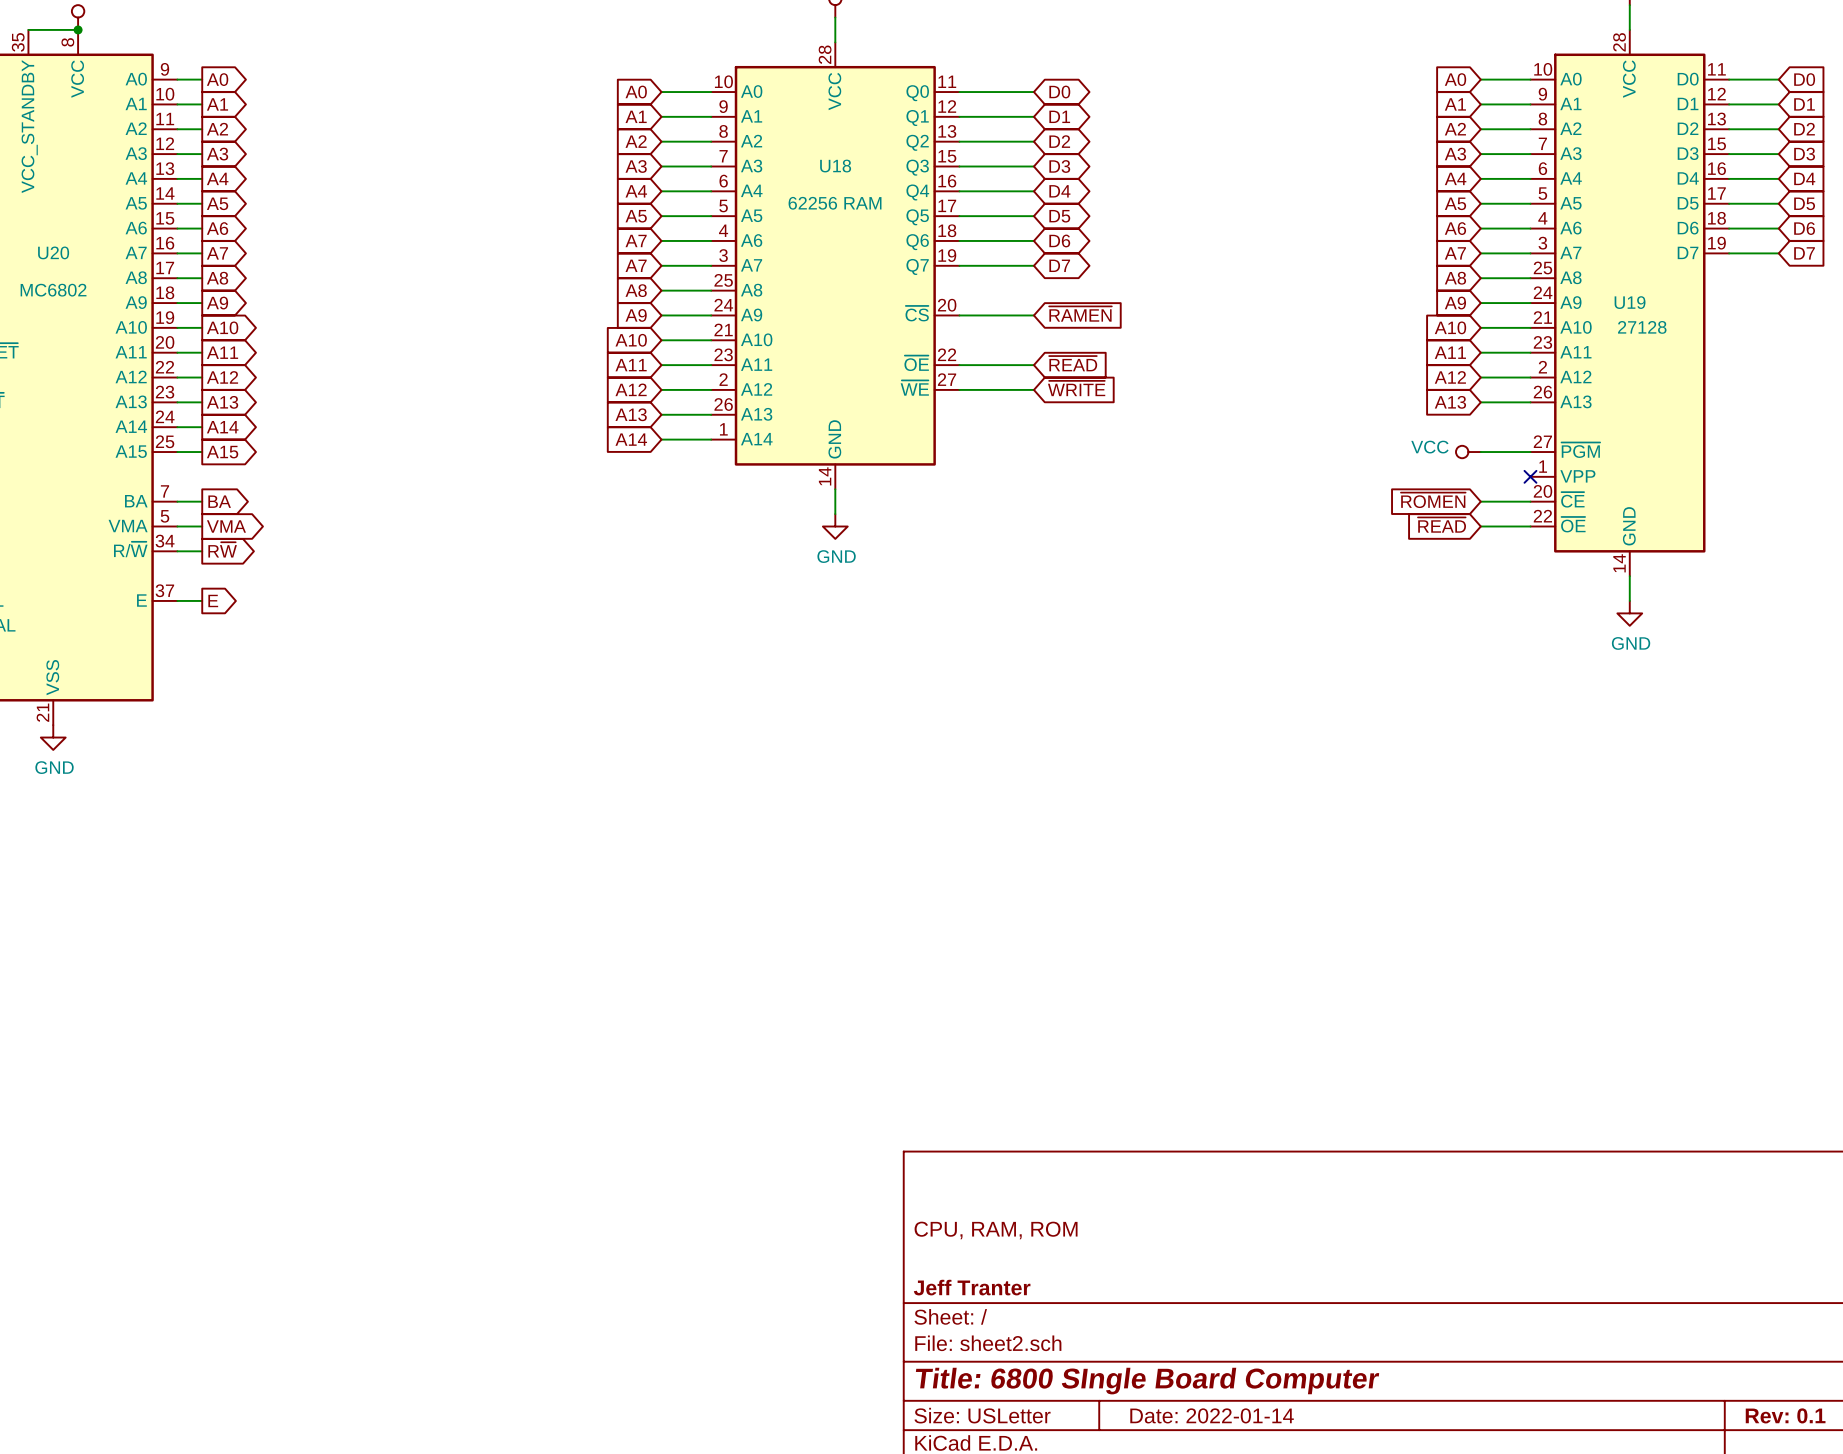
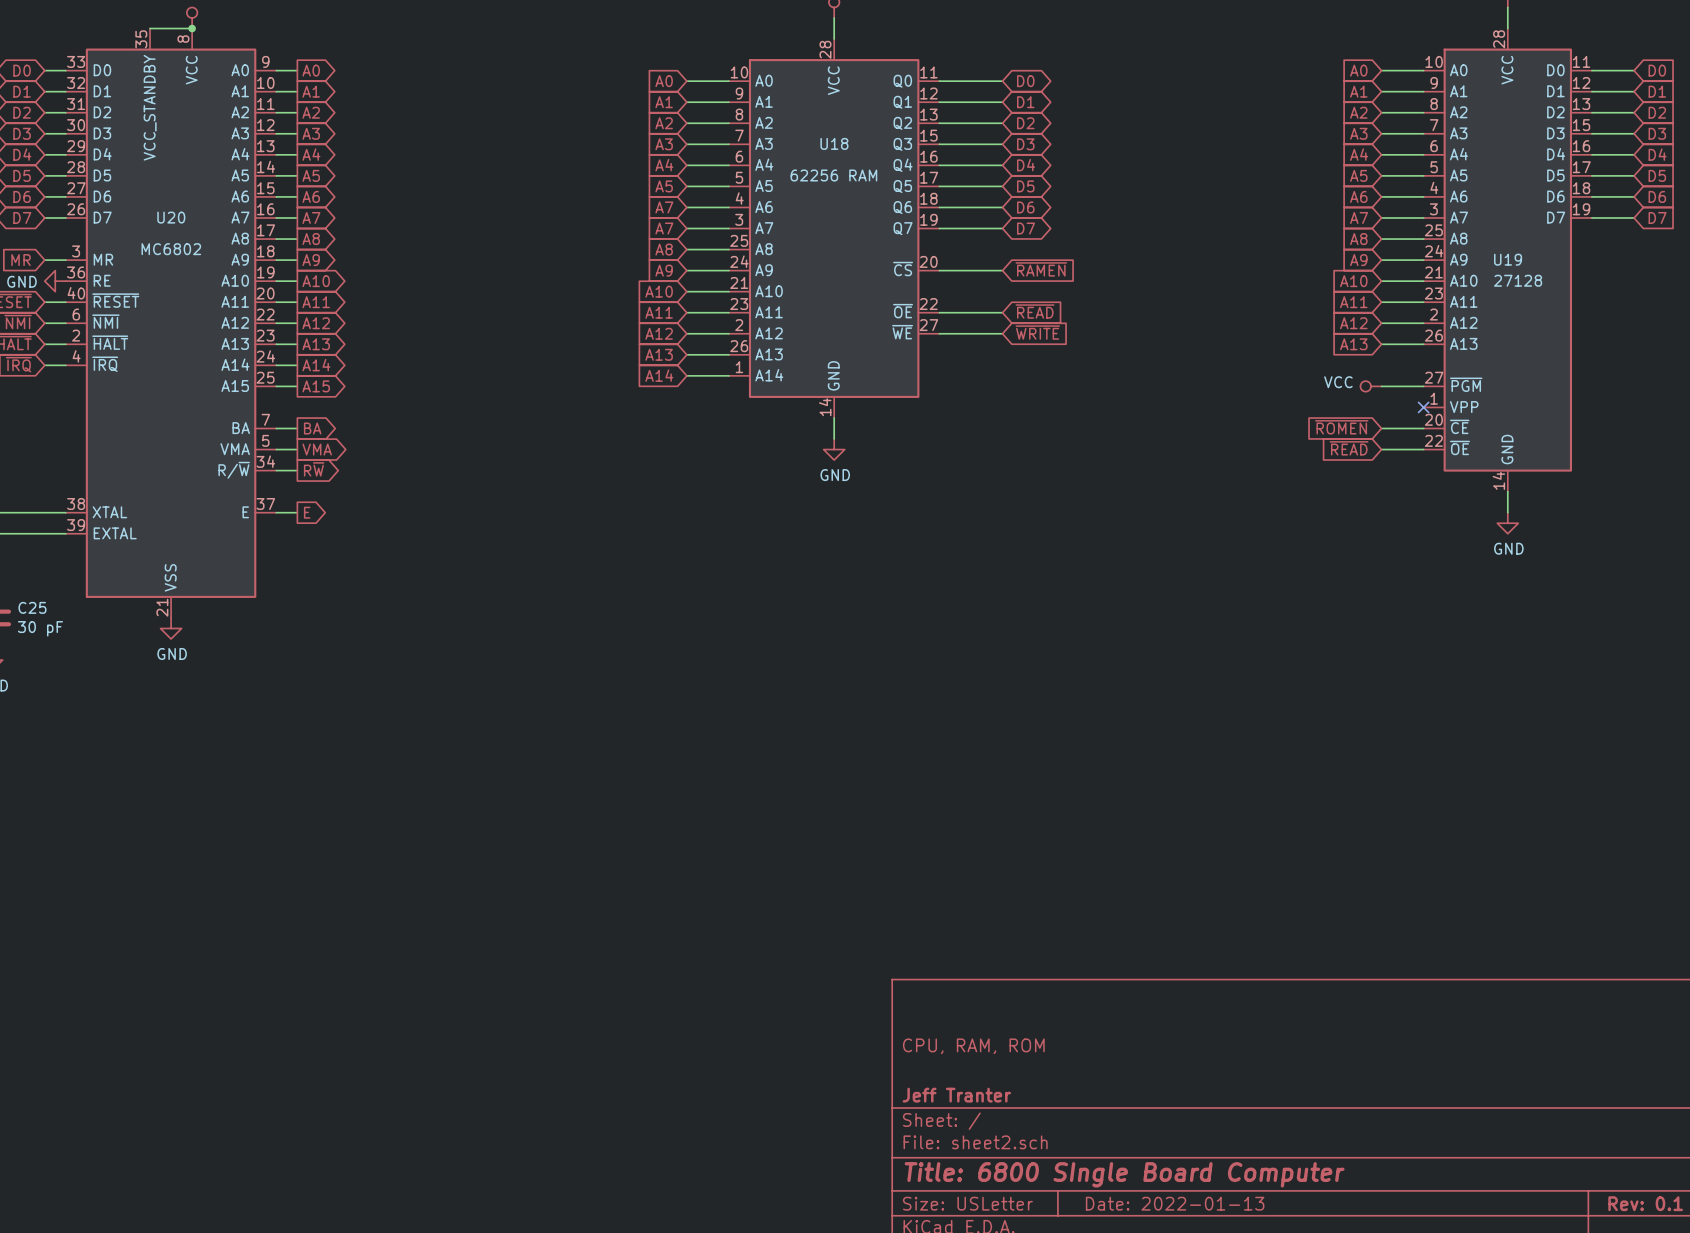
title block: Date: 2022-01-14 (1212, 1415) -> Date: 2022-01-13 (1175, 1203)

